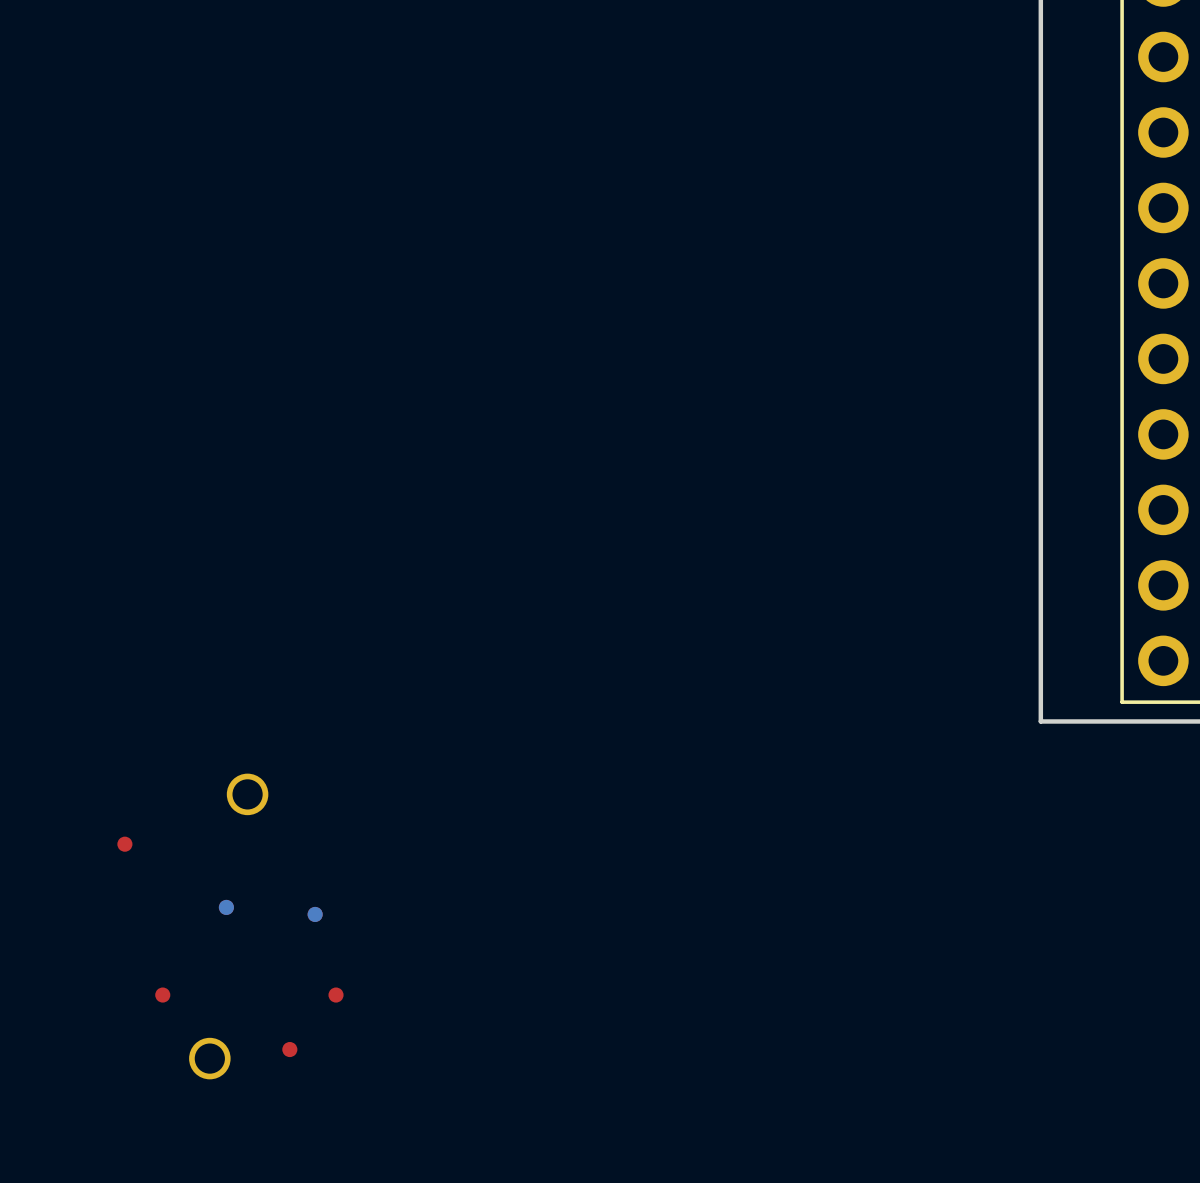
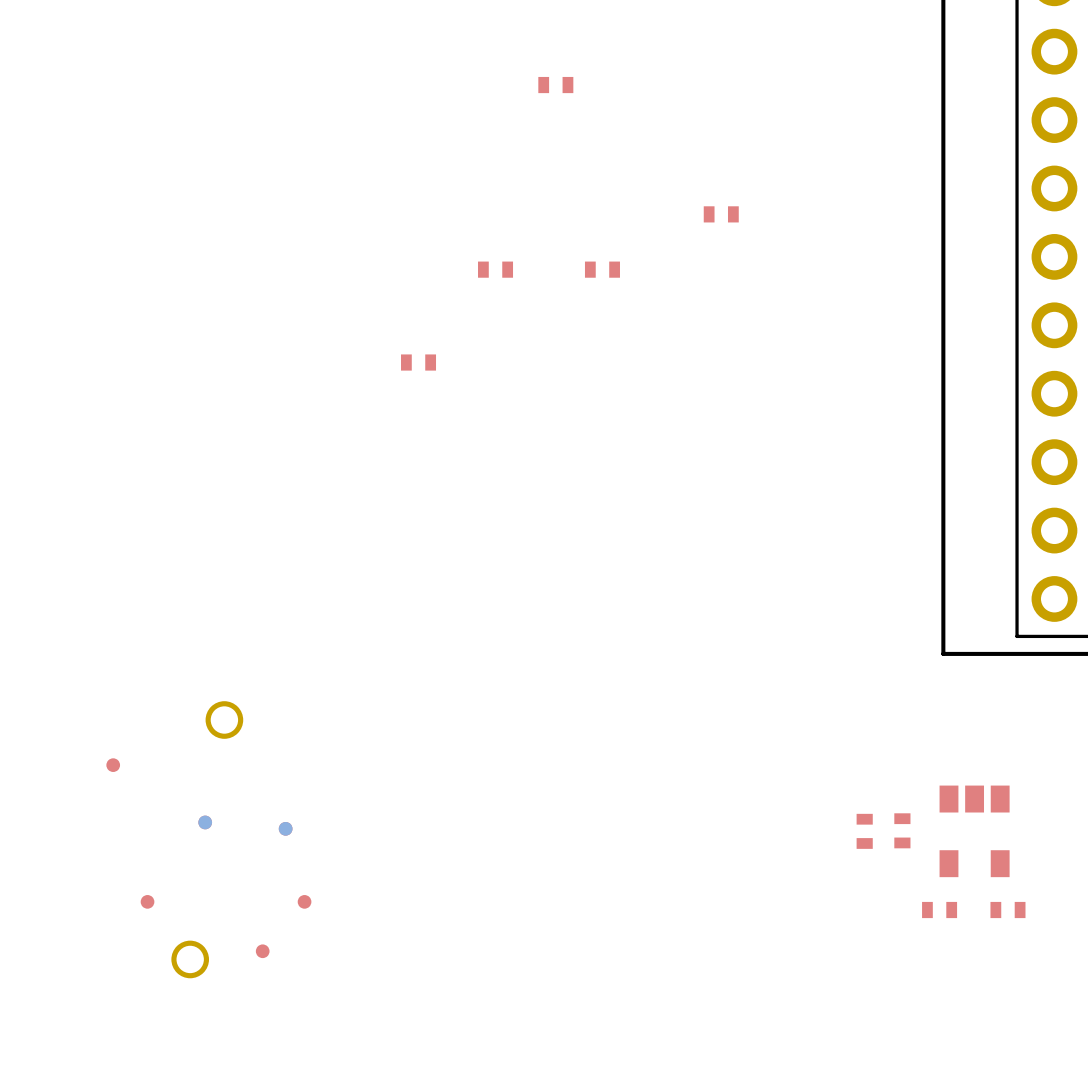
part: none -> (555, 85)
part: none -> (721, 214)
part: none -> (495, 269)
part: none -> (602, 269)
part: none -> (418, 362)
part: none -> (902, 830)
part: none -> (864, 831)
part: none -> (974, 831)
part: none -> (939, 910)
part: none -> (1007, 910)

